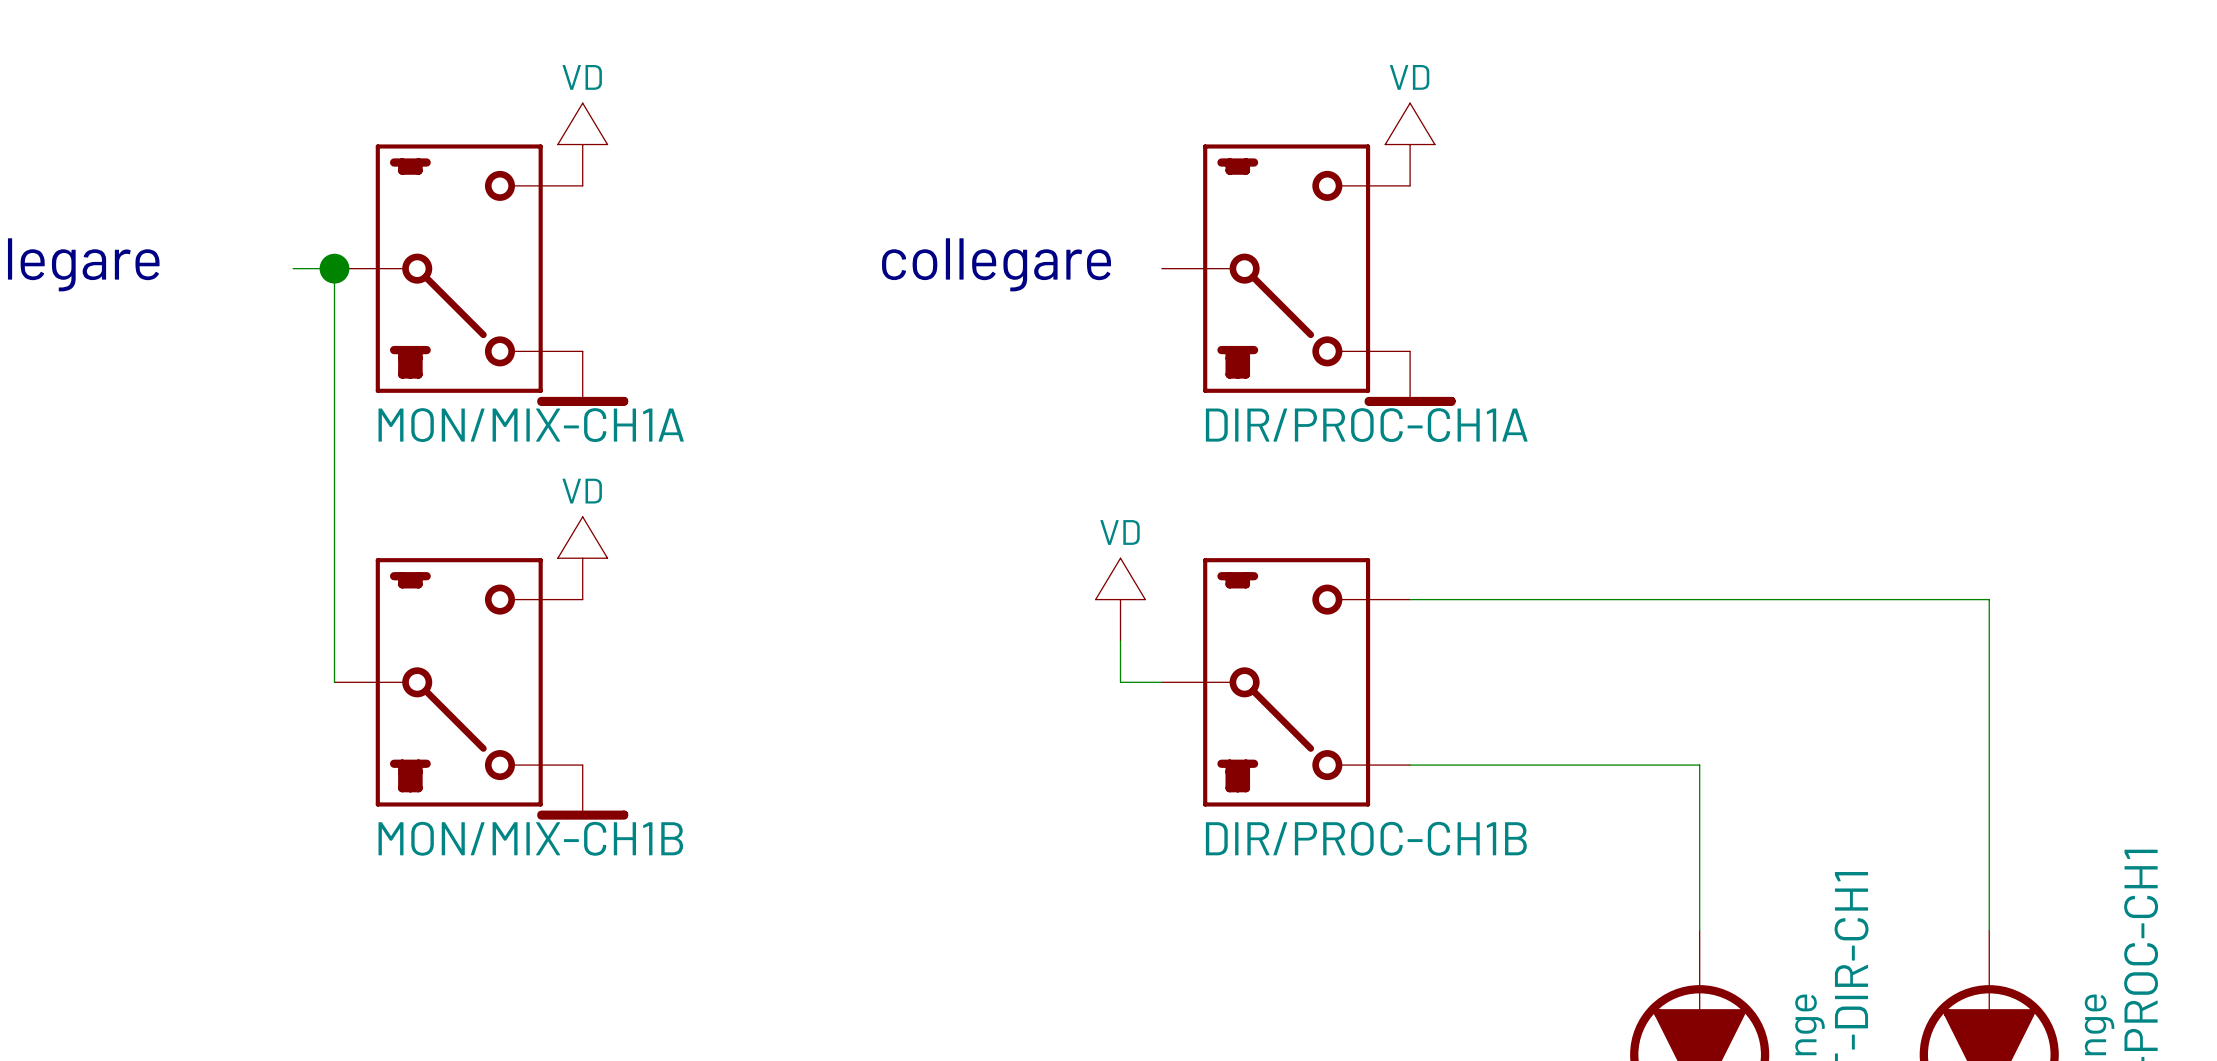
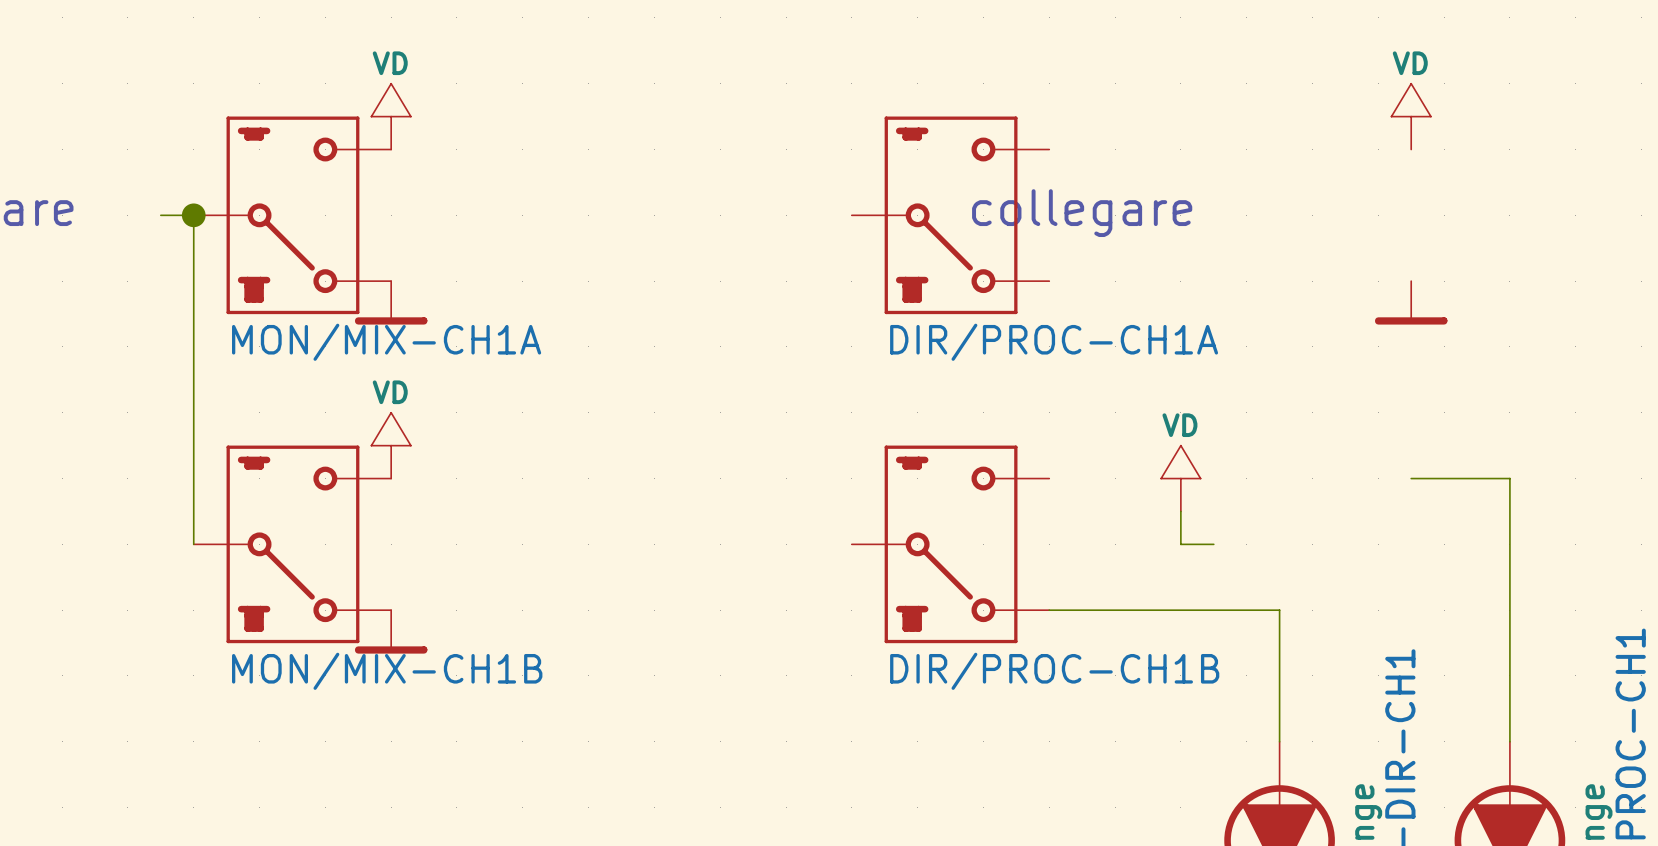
power symbol: VD (1410, 144) -> none
power symbol: none -> VD (1411, 116)
text position: collegare (996, 264) -> collegare (1082, 213)
power symbol position: (1410, 378) -> (1411, 302)
power symbol: VD (1120, 599) -> none
wire: (1410, 599) (1865, 599) -> none
power symbol: none -> VD (1180, 478)
wire: (1120, 640) (1120, 682) (1161, 682) -> (1180, 511) (1180, 544) (1213, 544)

